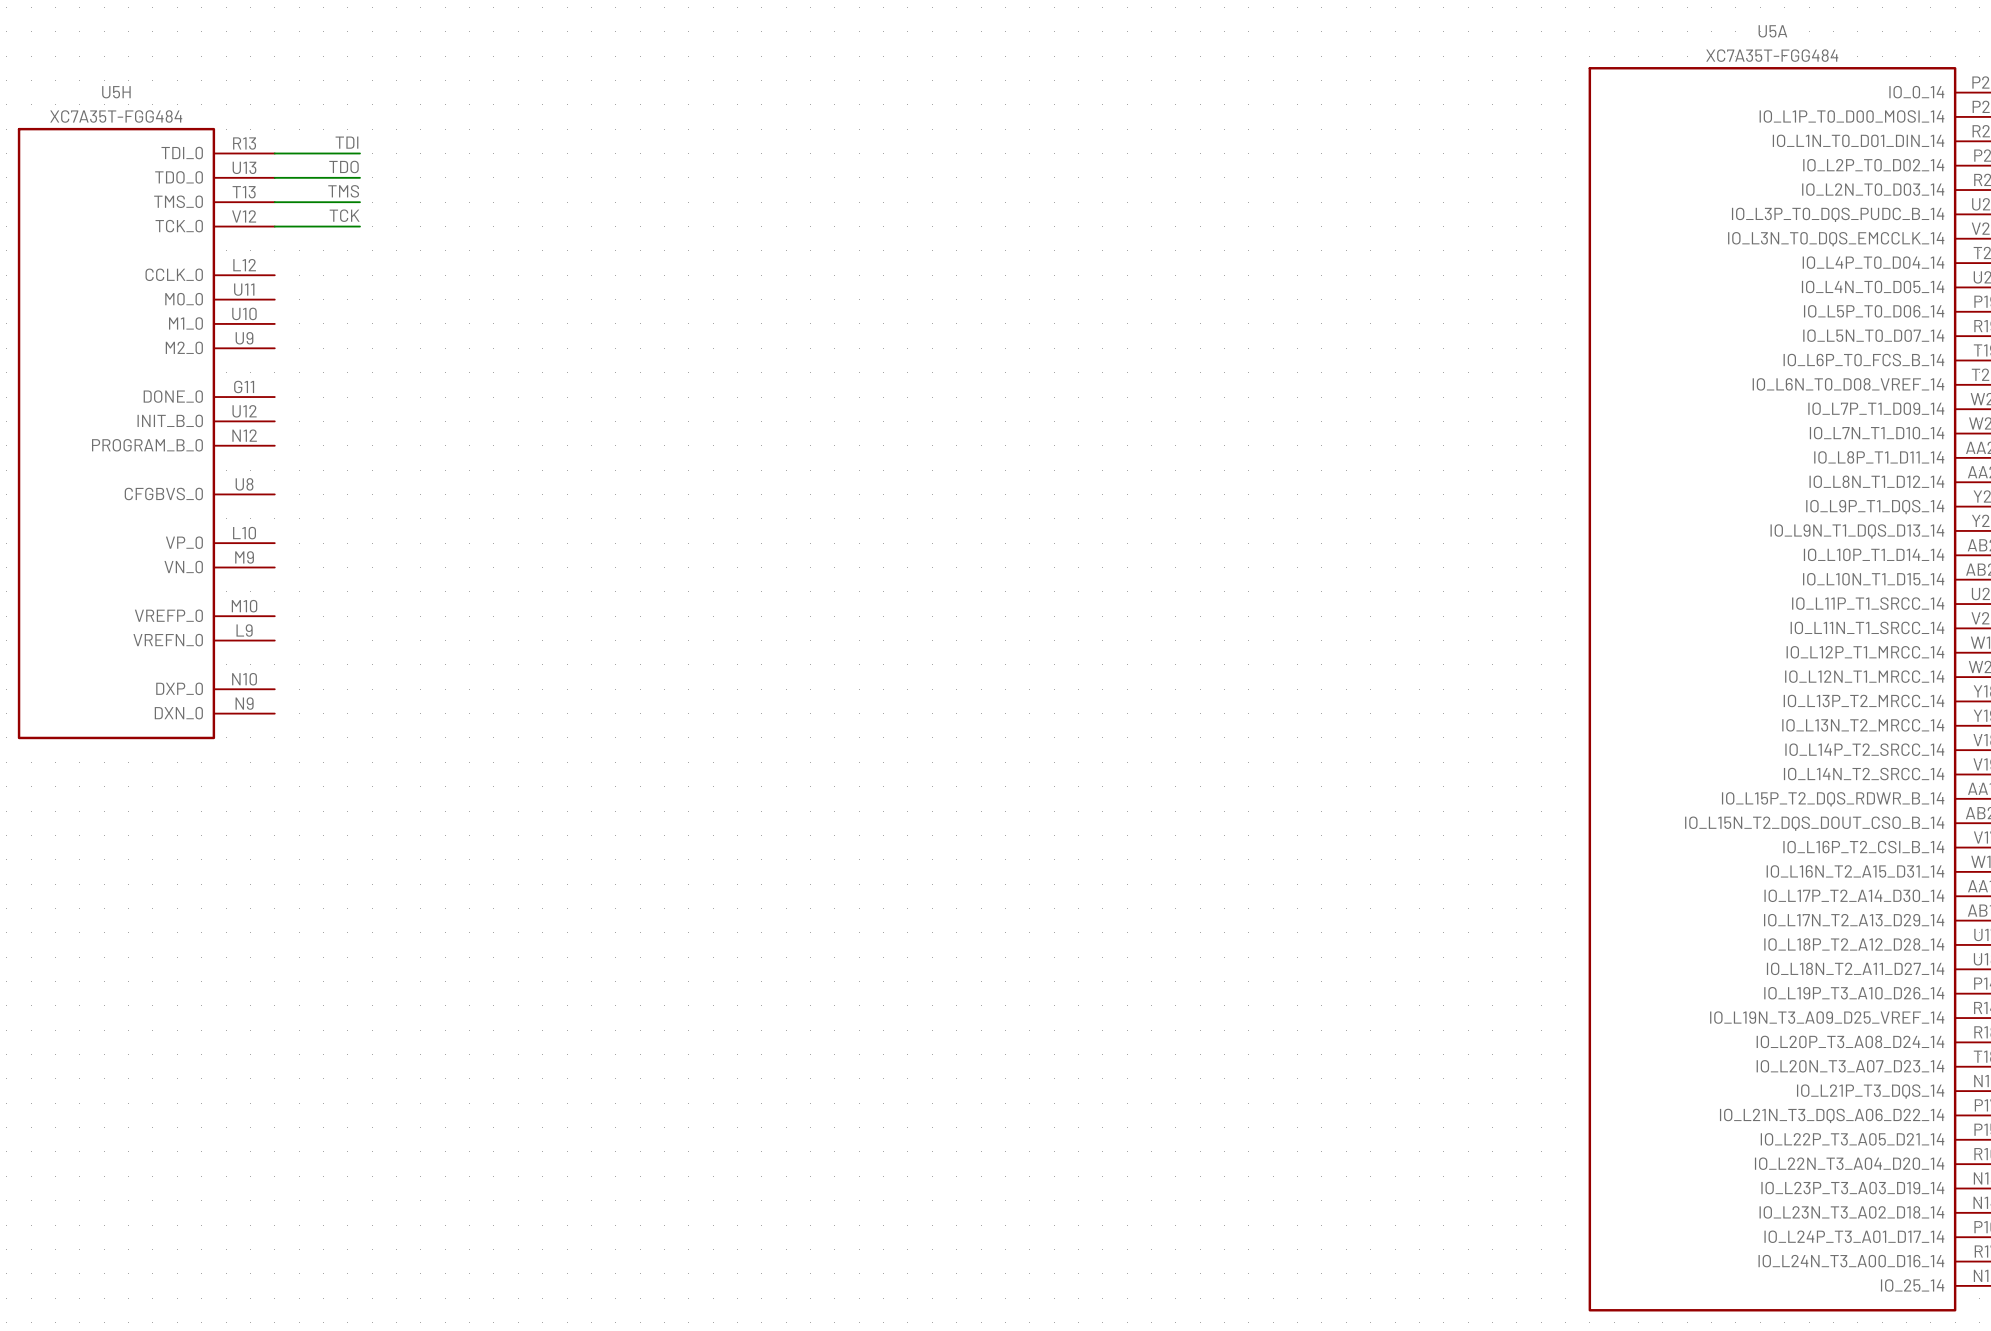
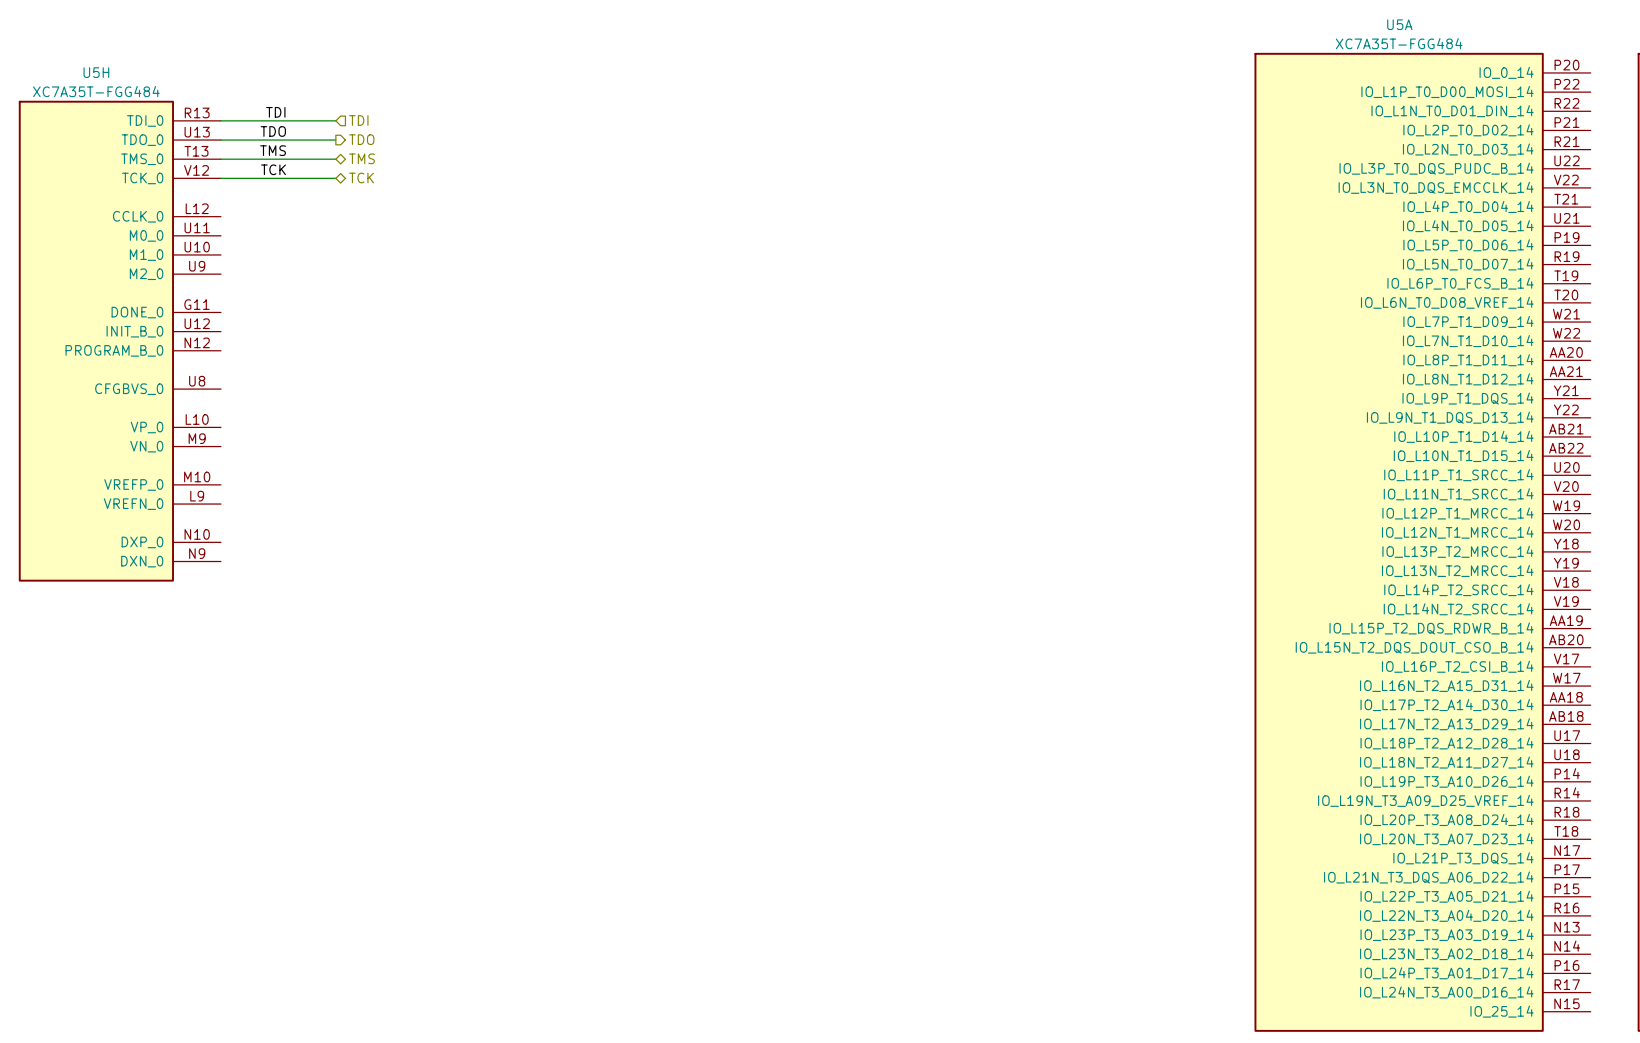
wire: none -> (287, 120) (335, 120)
hierarchical label: none -> TDI (358, 120)
wire: none -> (287, 140) (335, 140)
hierarchical label: none -> TDO (361, 139)
hierarchical label: none -> TMS (362, 158)
wire: none -> (287, 159) (335, 159)
wire: none -> (287, 178) (335, 178)
hierarchical label: none -> TCK (361, 177)

